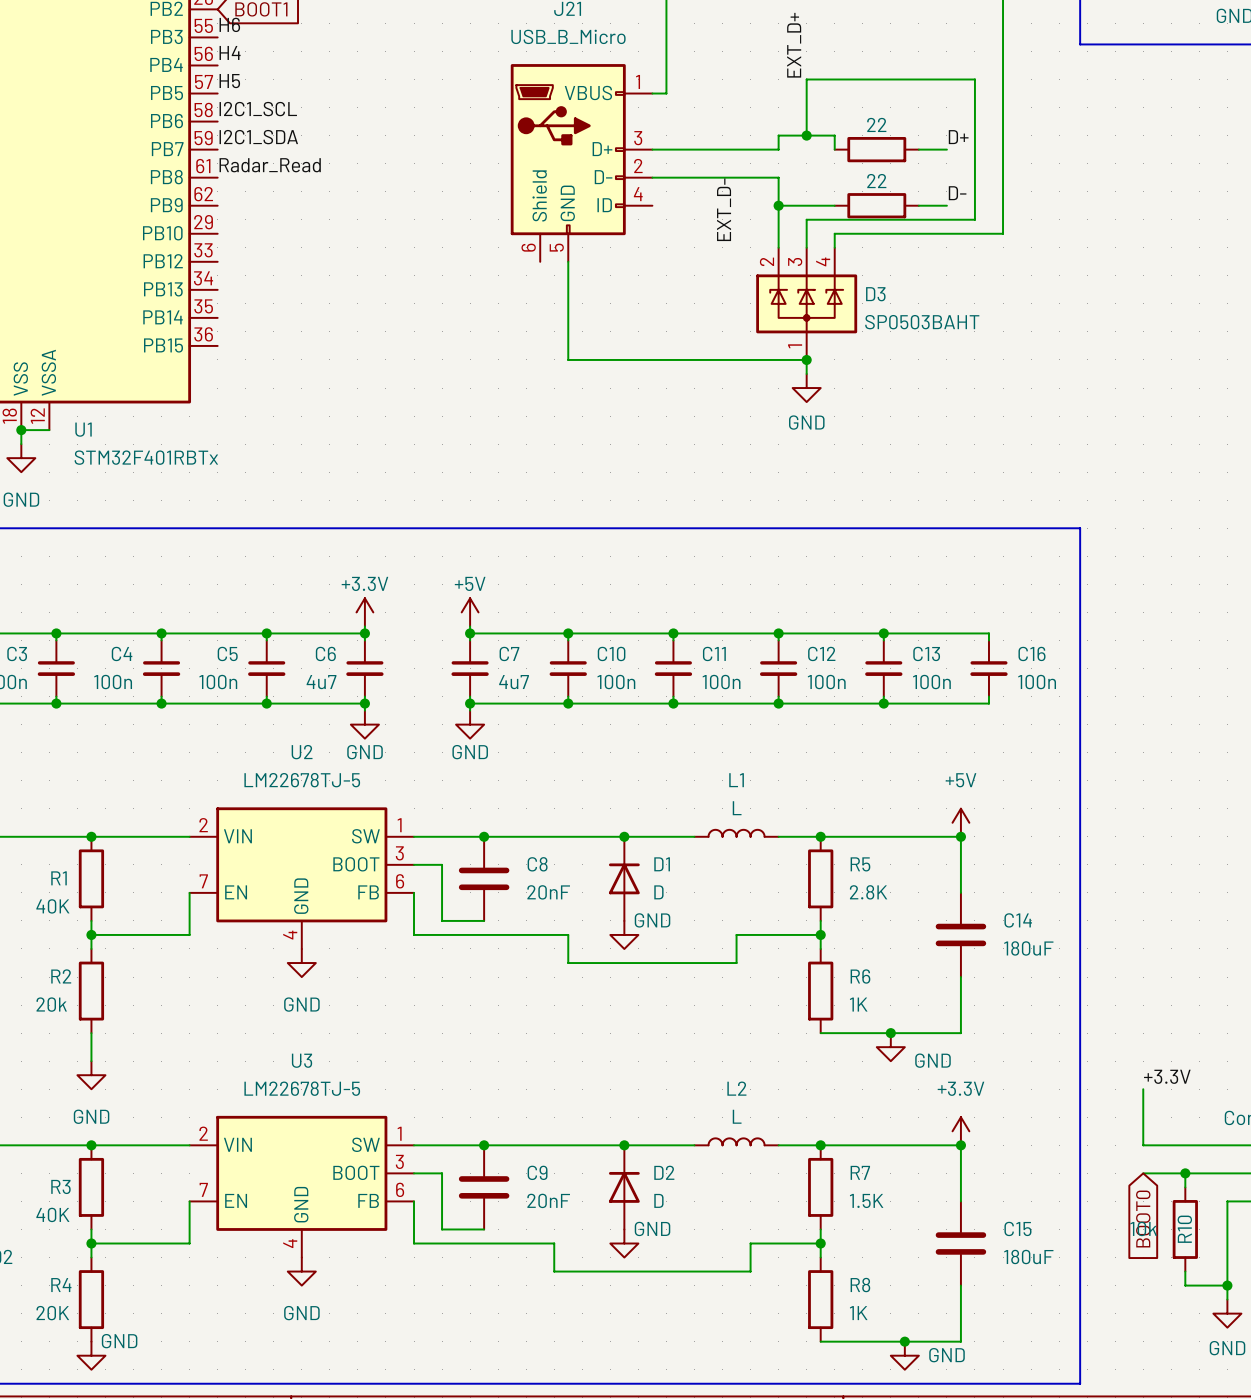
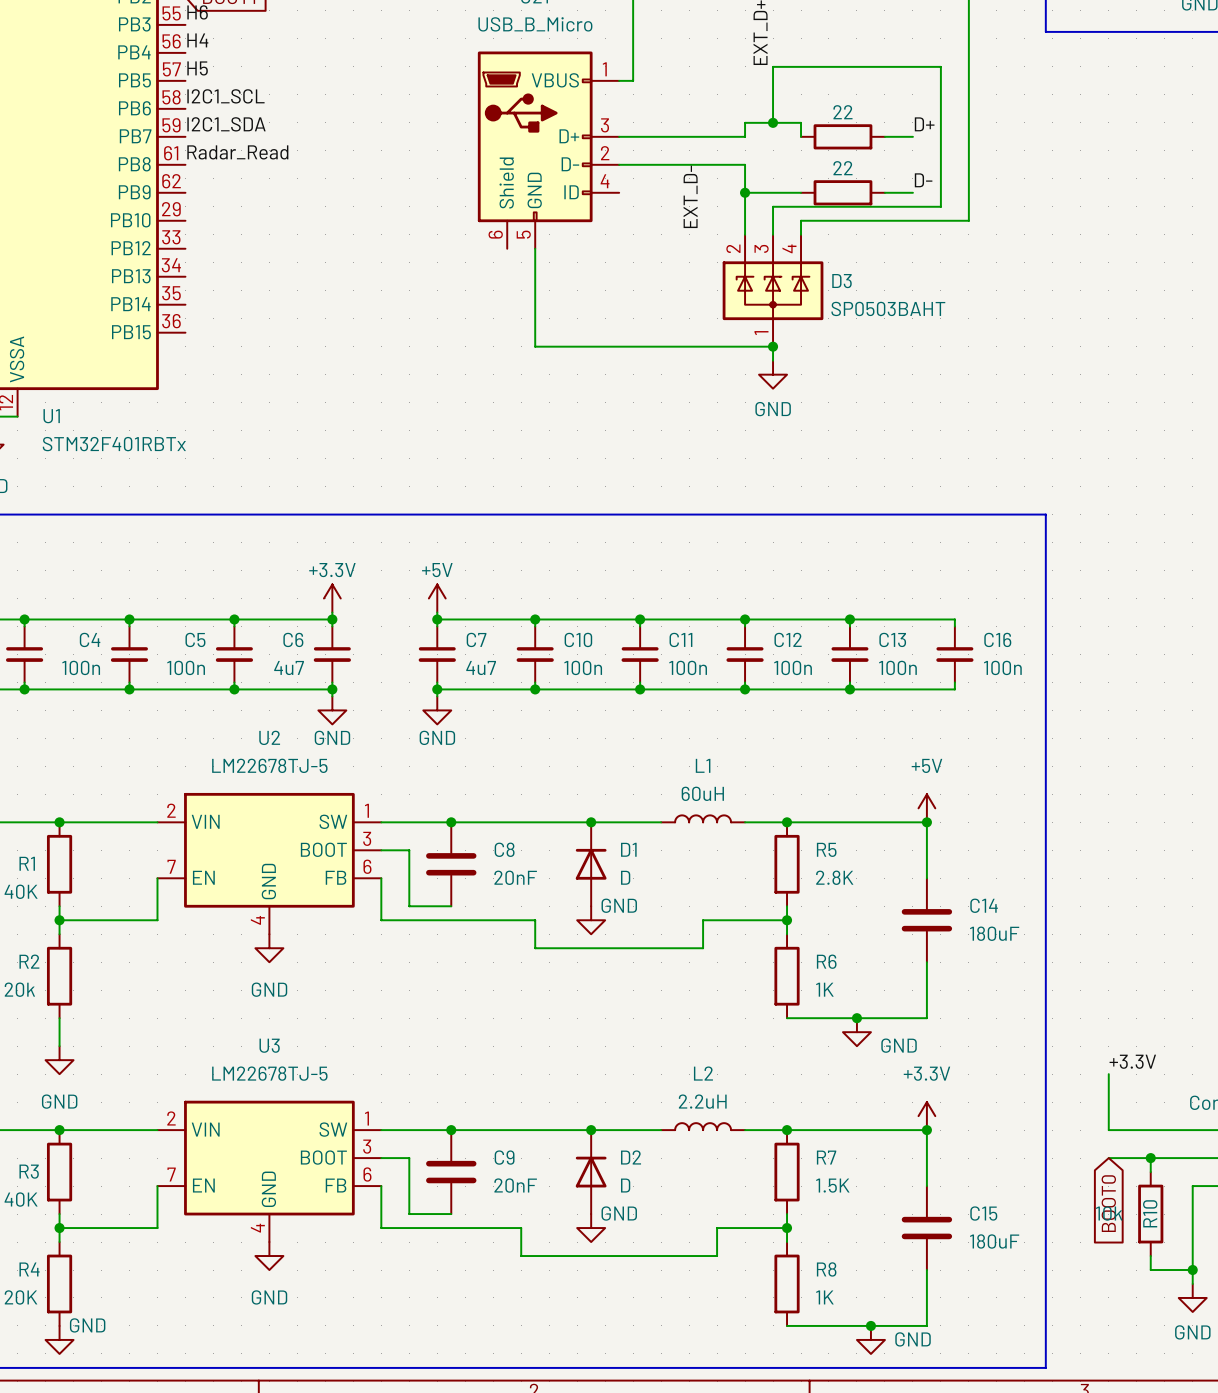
L1 value: L (737, 808) -> 60uH (702, 793)
L2 value: L (737, 1116) -> 2.2uH (702, 1101)

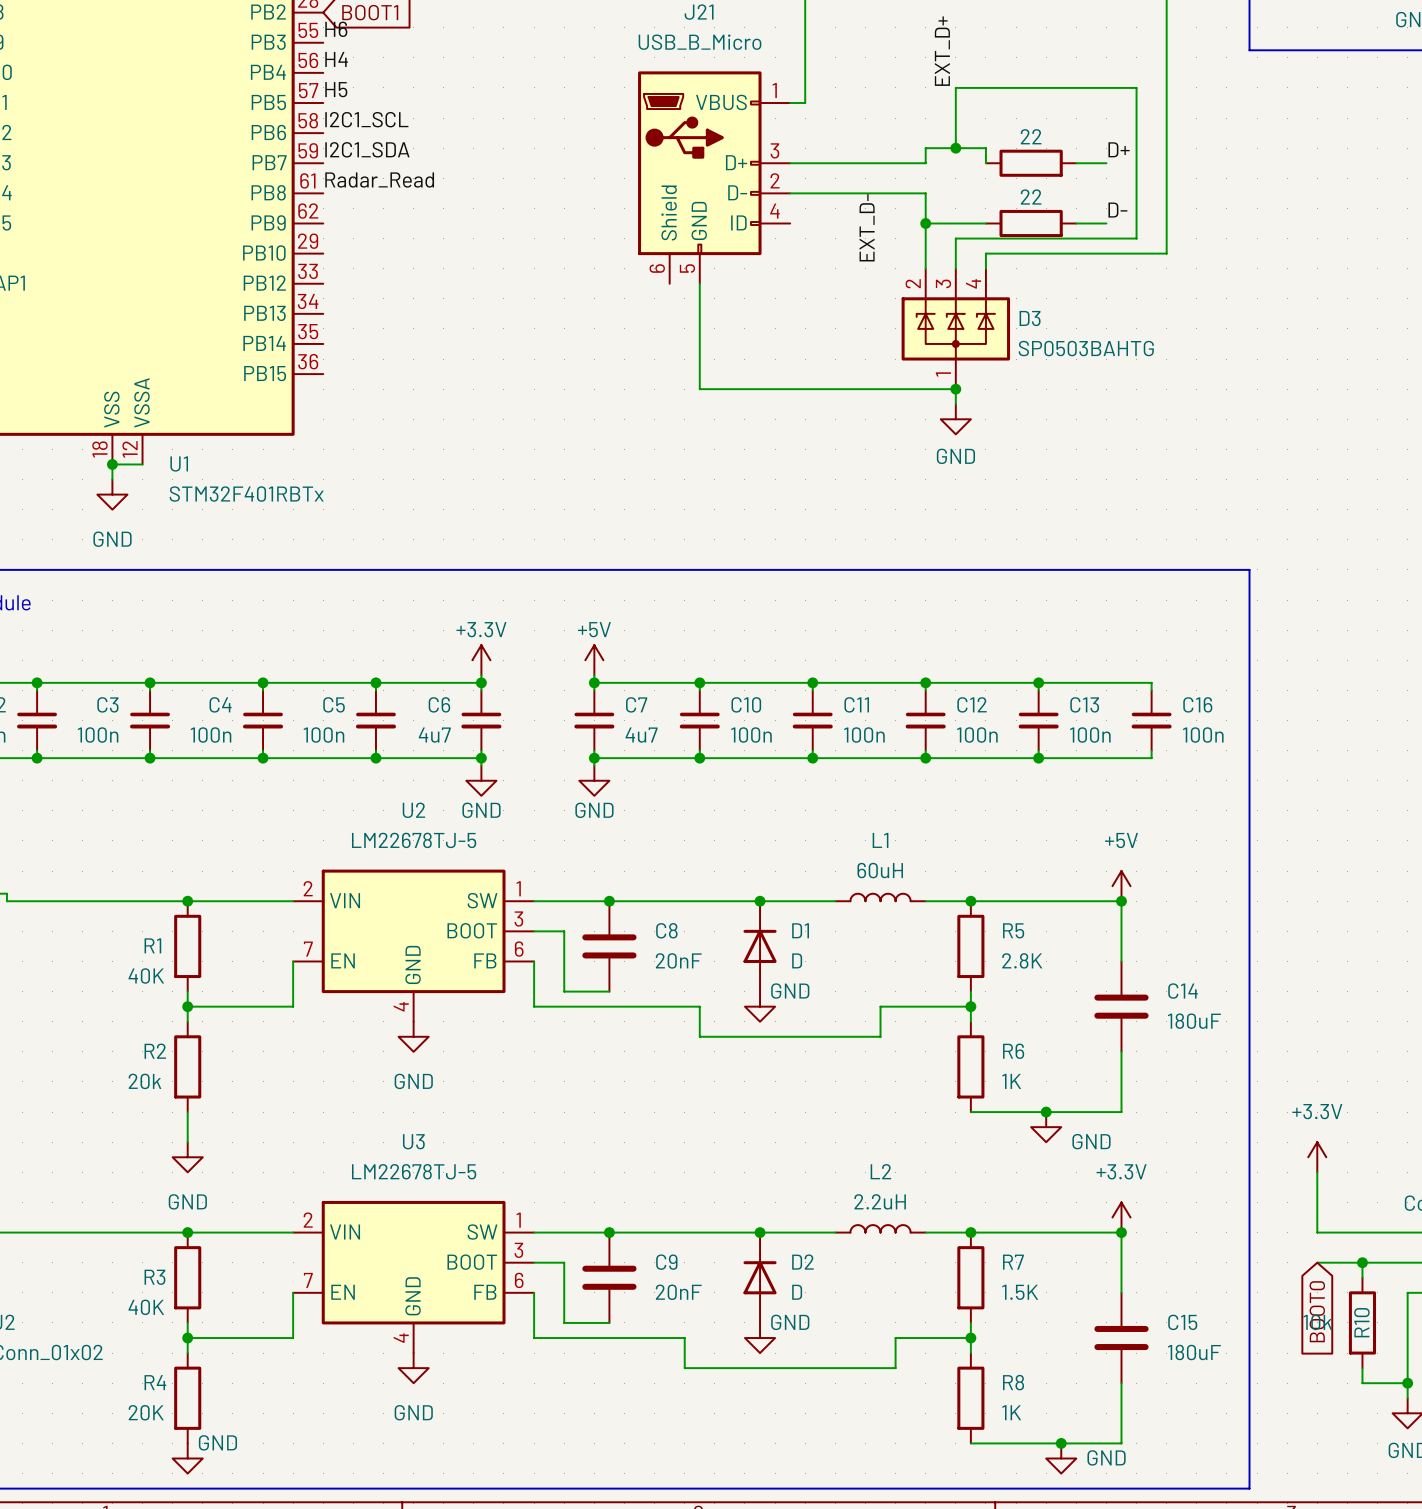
D3 value: SP0503BAHT (888, 308) -> SP0503BAHTG (1086, 348)
power symbol: none -> +3.3V (1317, 1157)
label: +3.3V (1132, 1061) -> none

